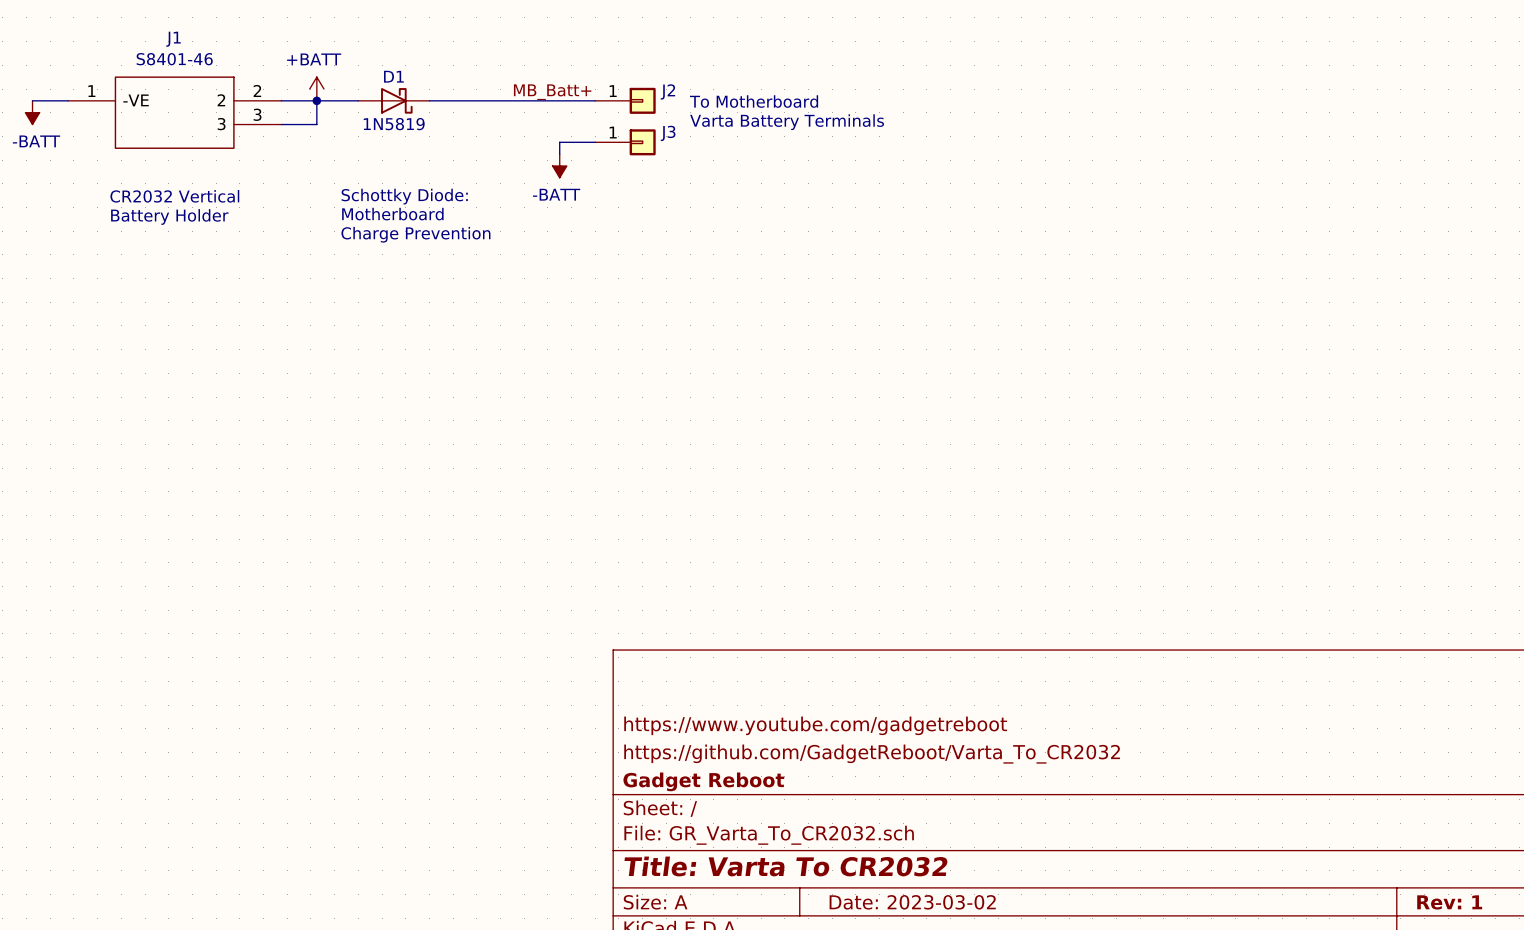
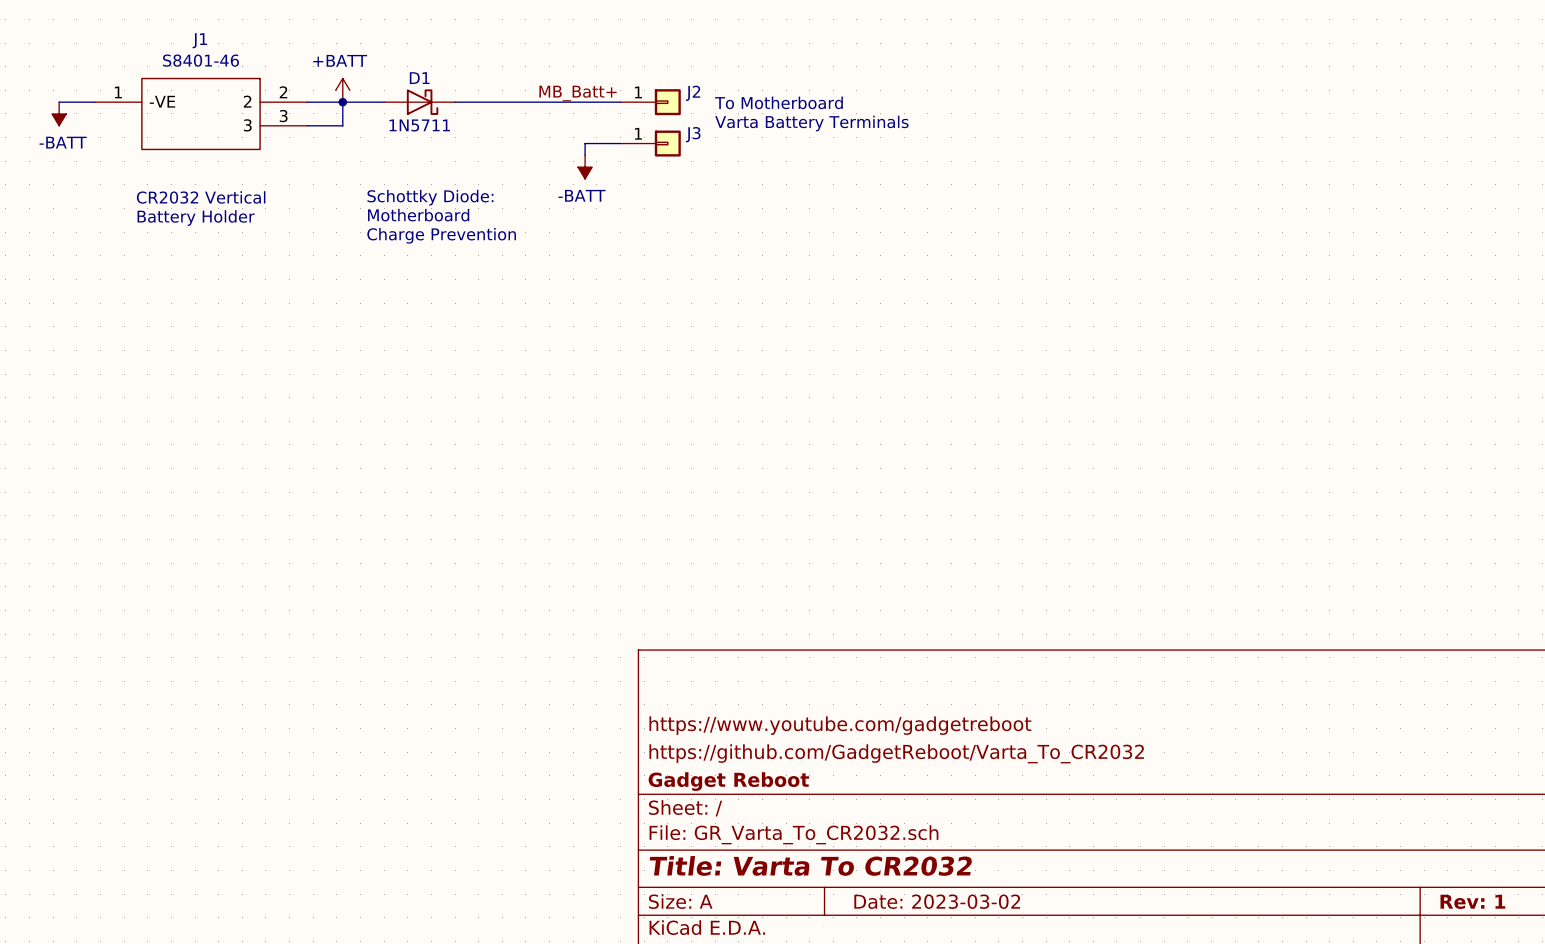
D1 value: 1N5819 (394, 124) -> 1N5711 (419, 125)

